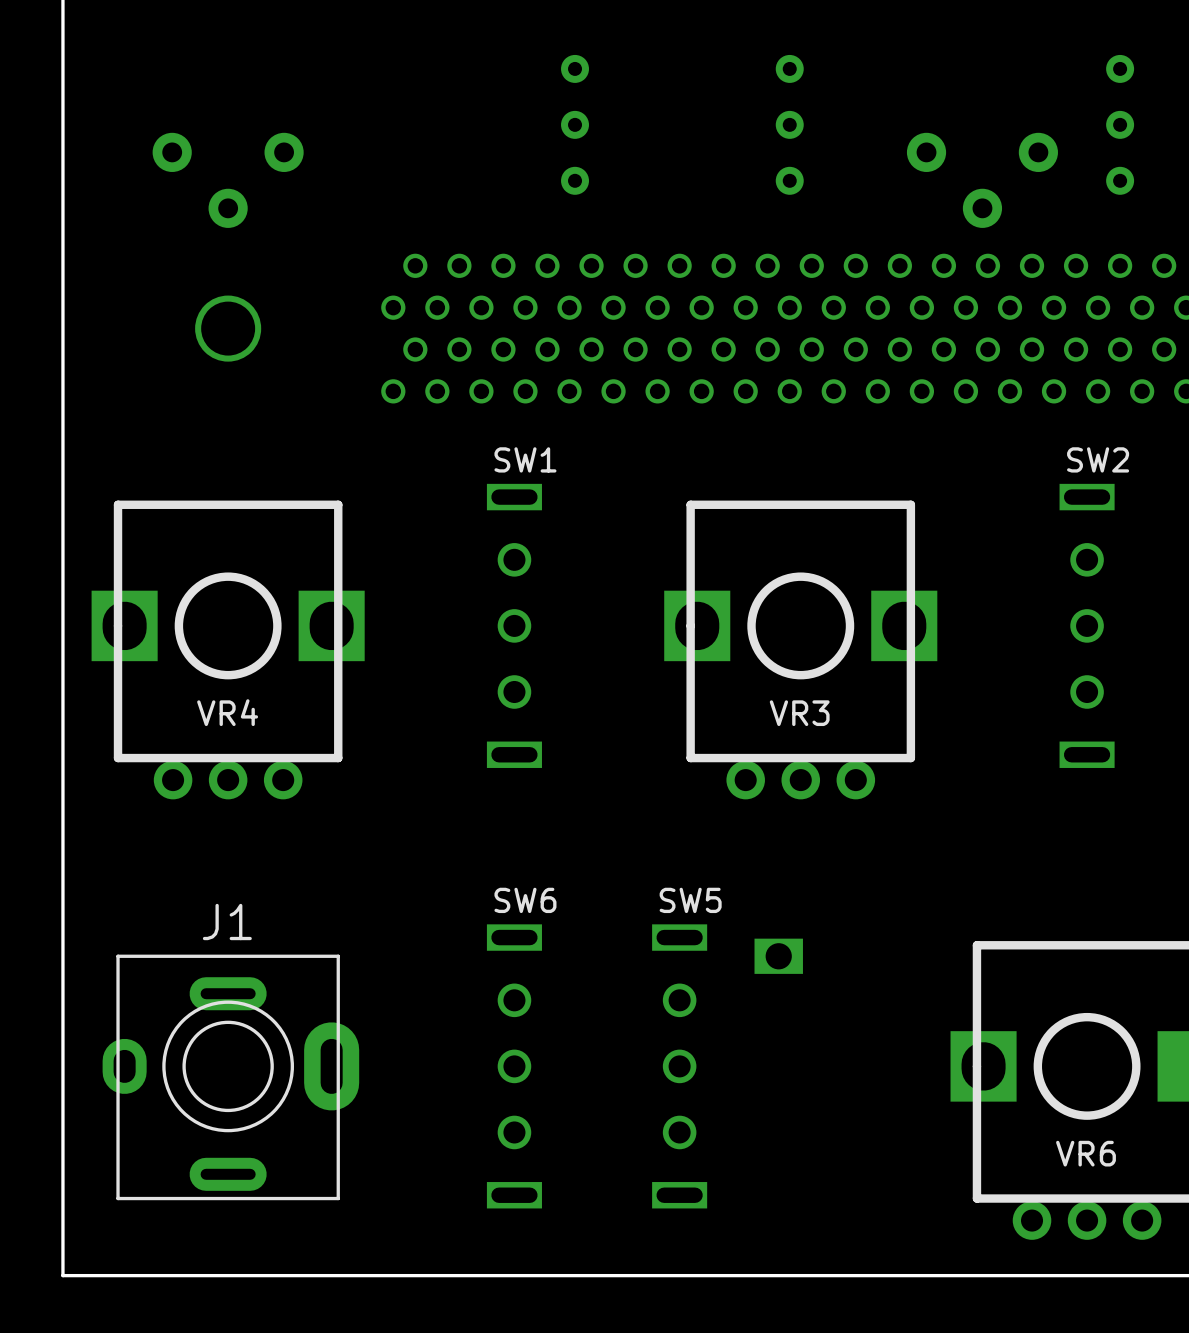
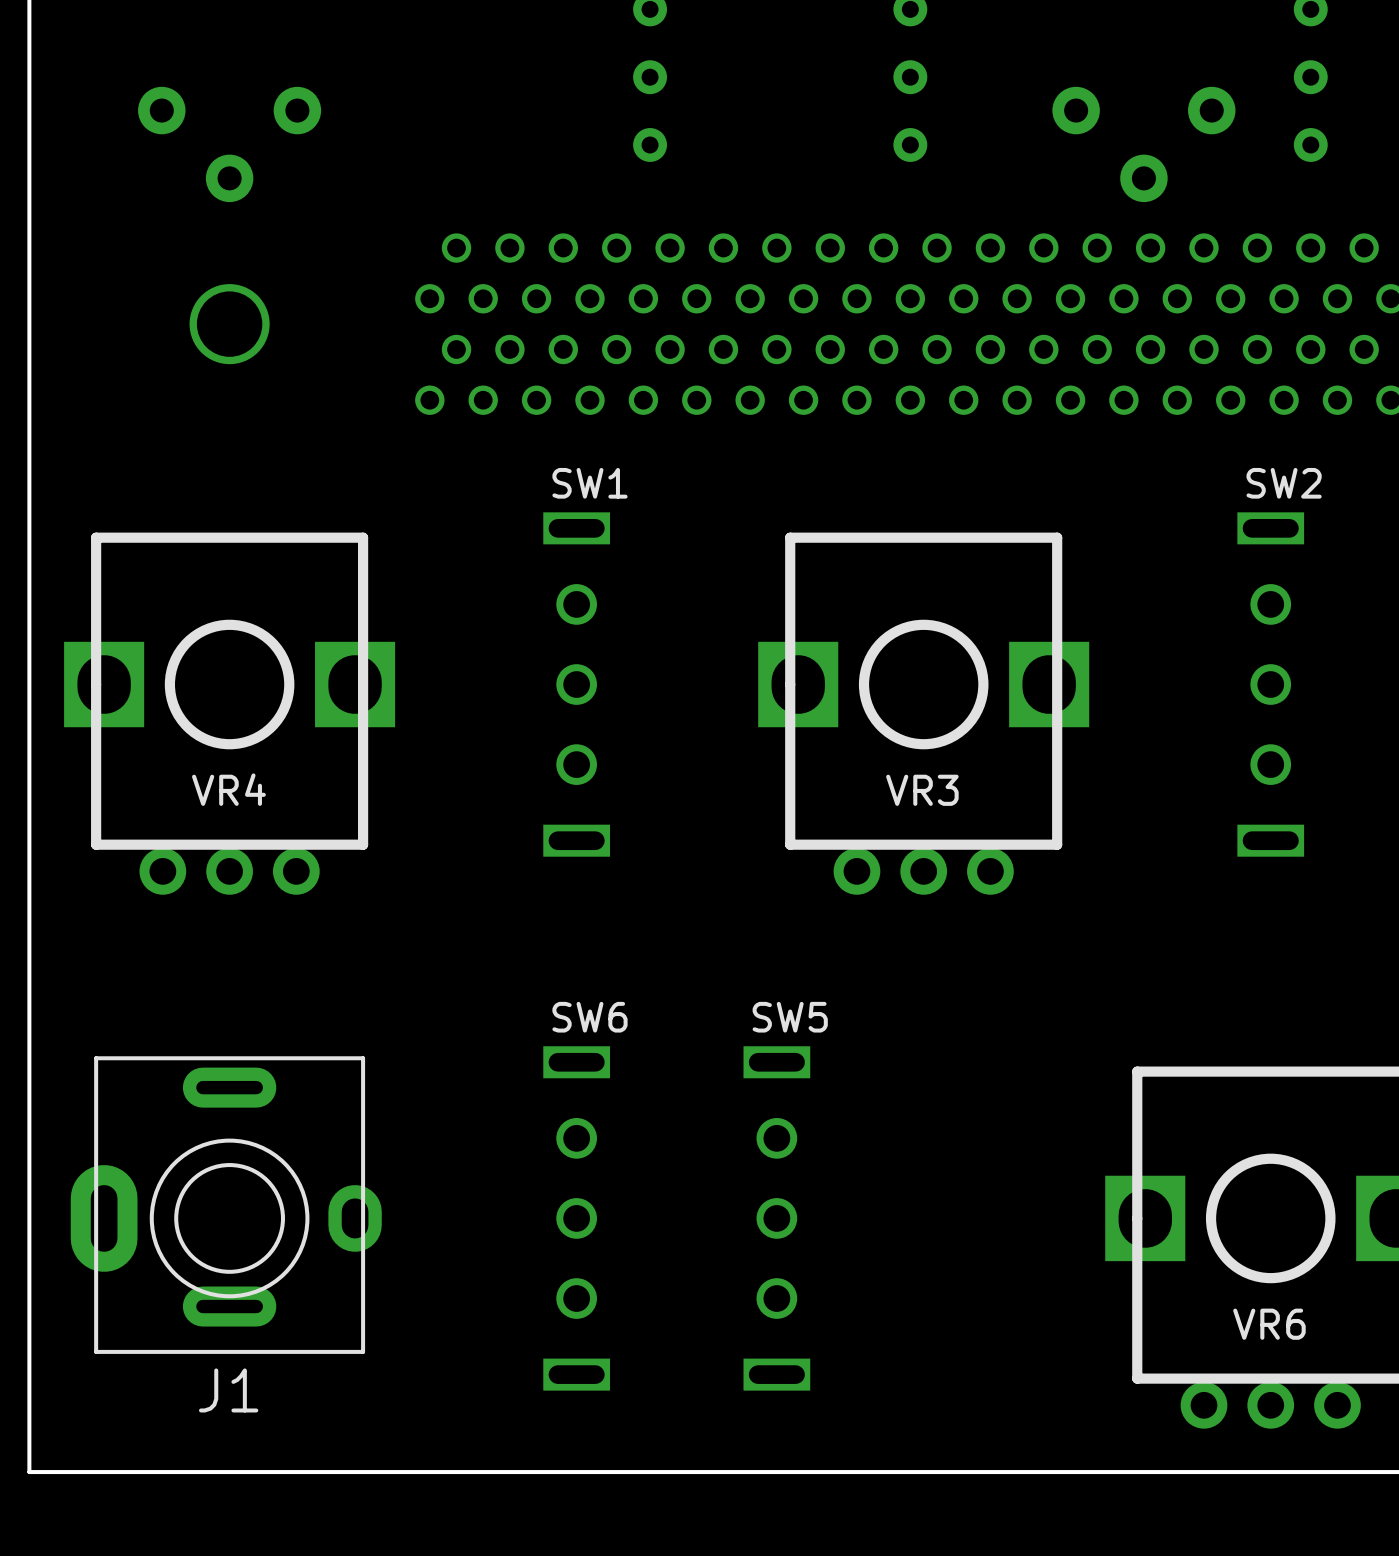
part: (778, 956) -> none
J1 rotation: 0° (230, 1077) -> 180° (226, 1205)

